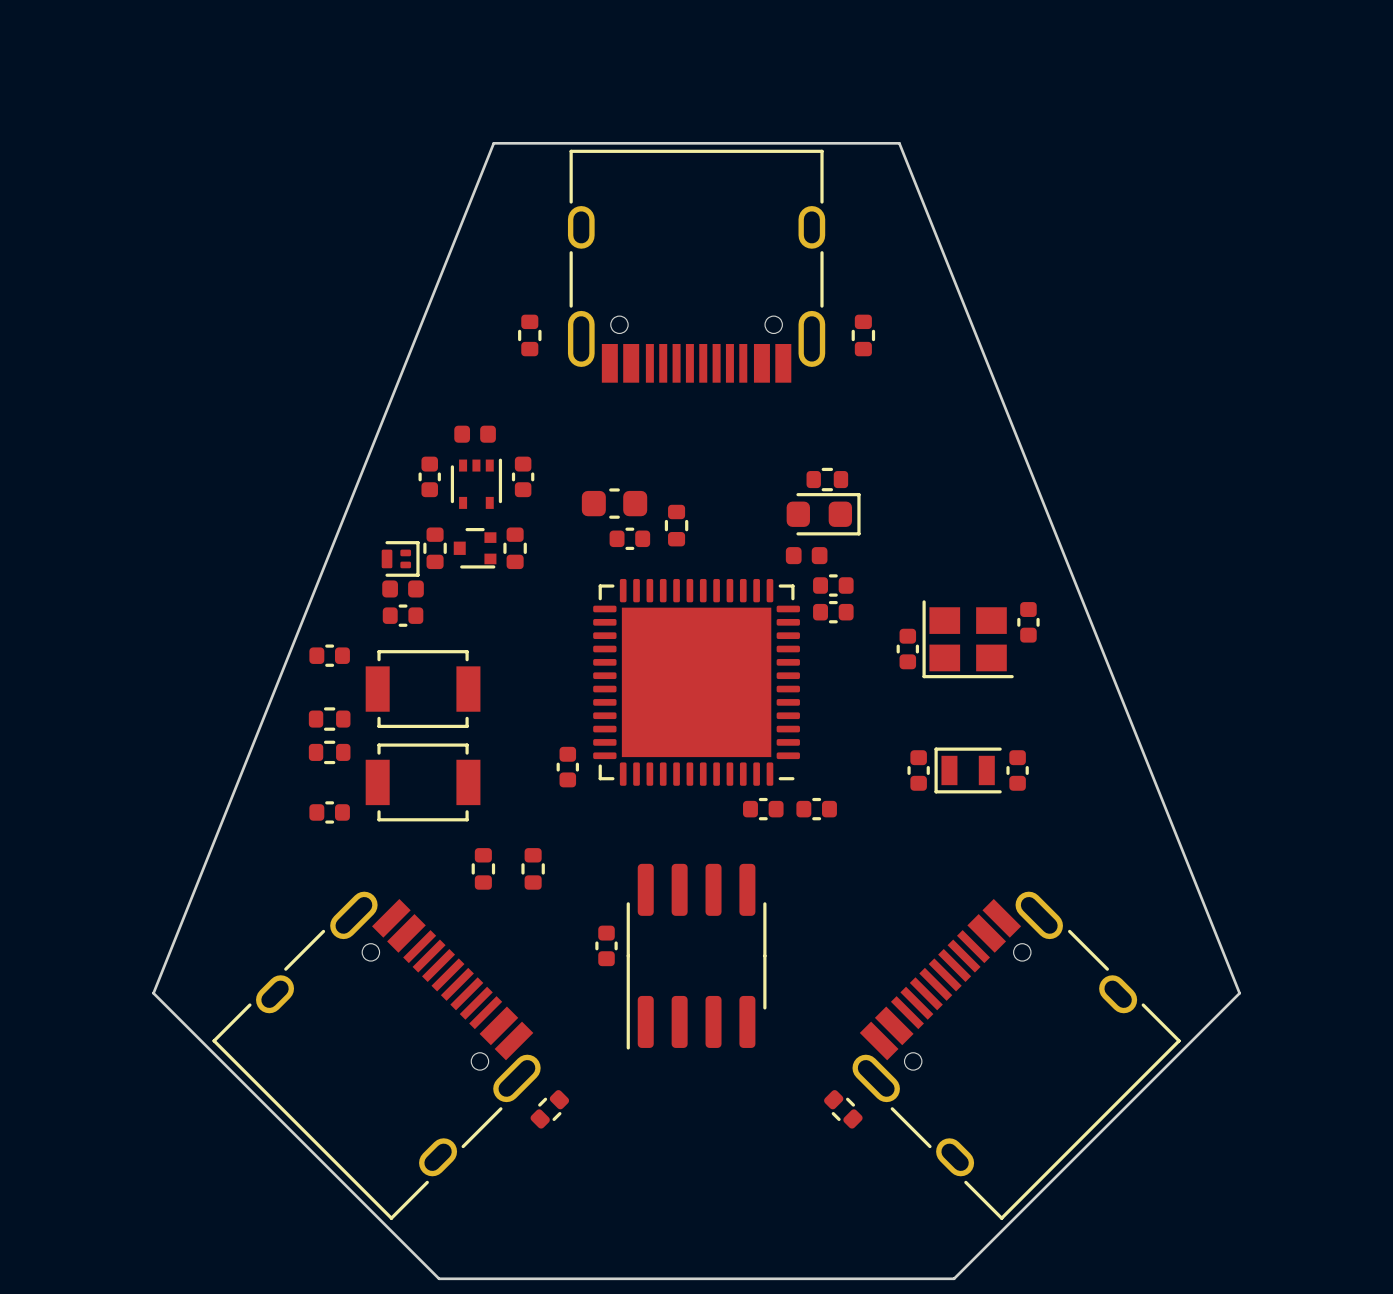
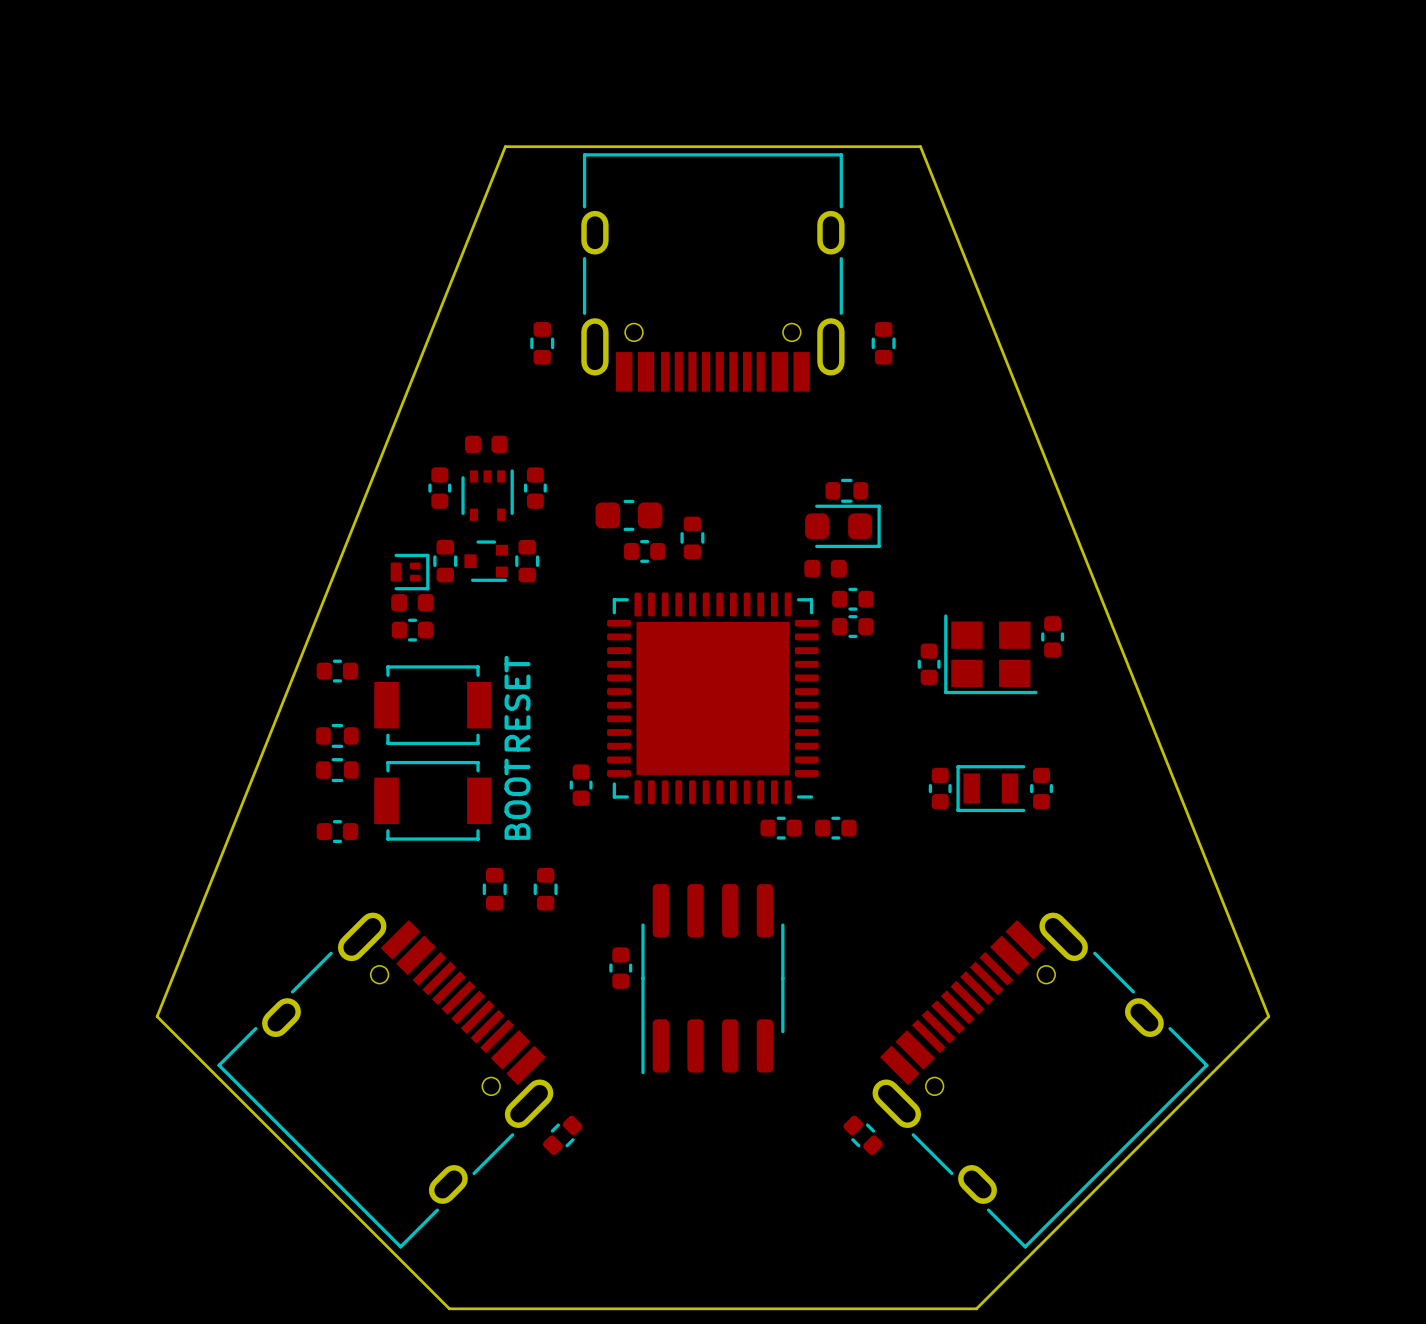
text: none -> RESET (517, 703)
text: none -> BOOT (517, 799)

